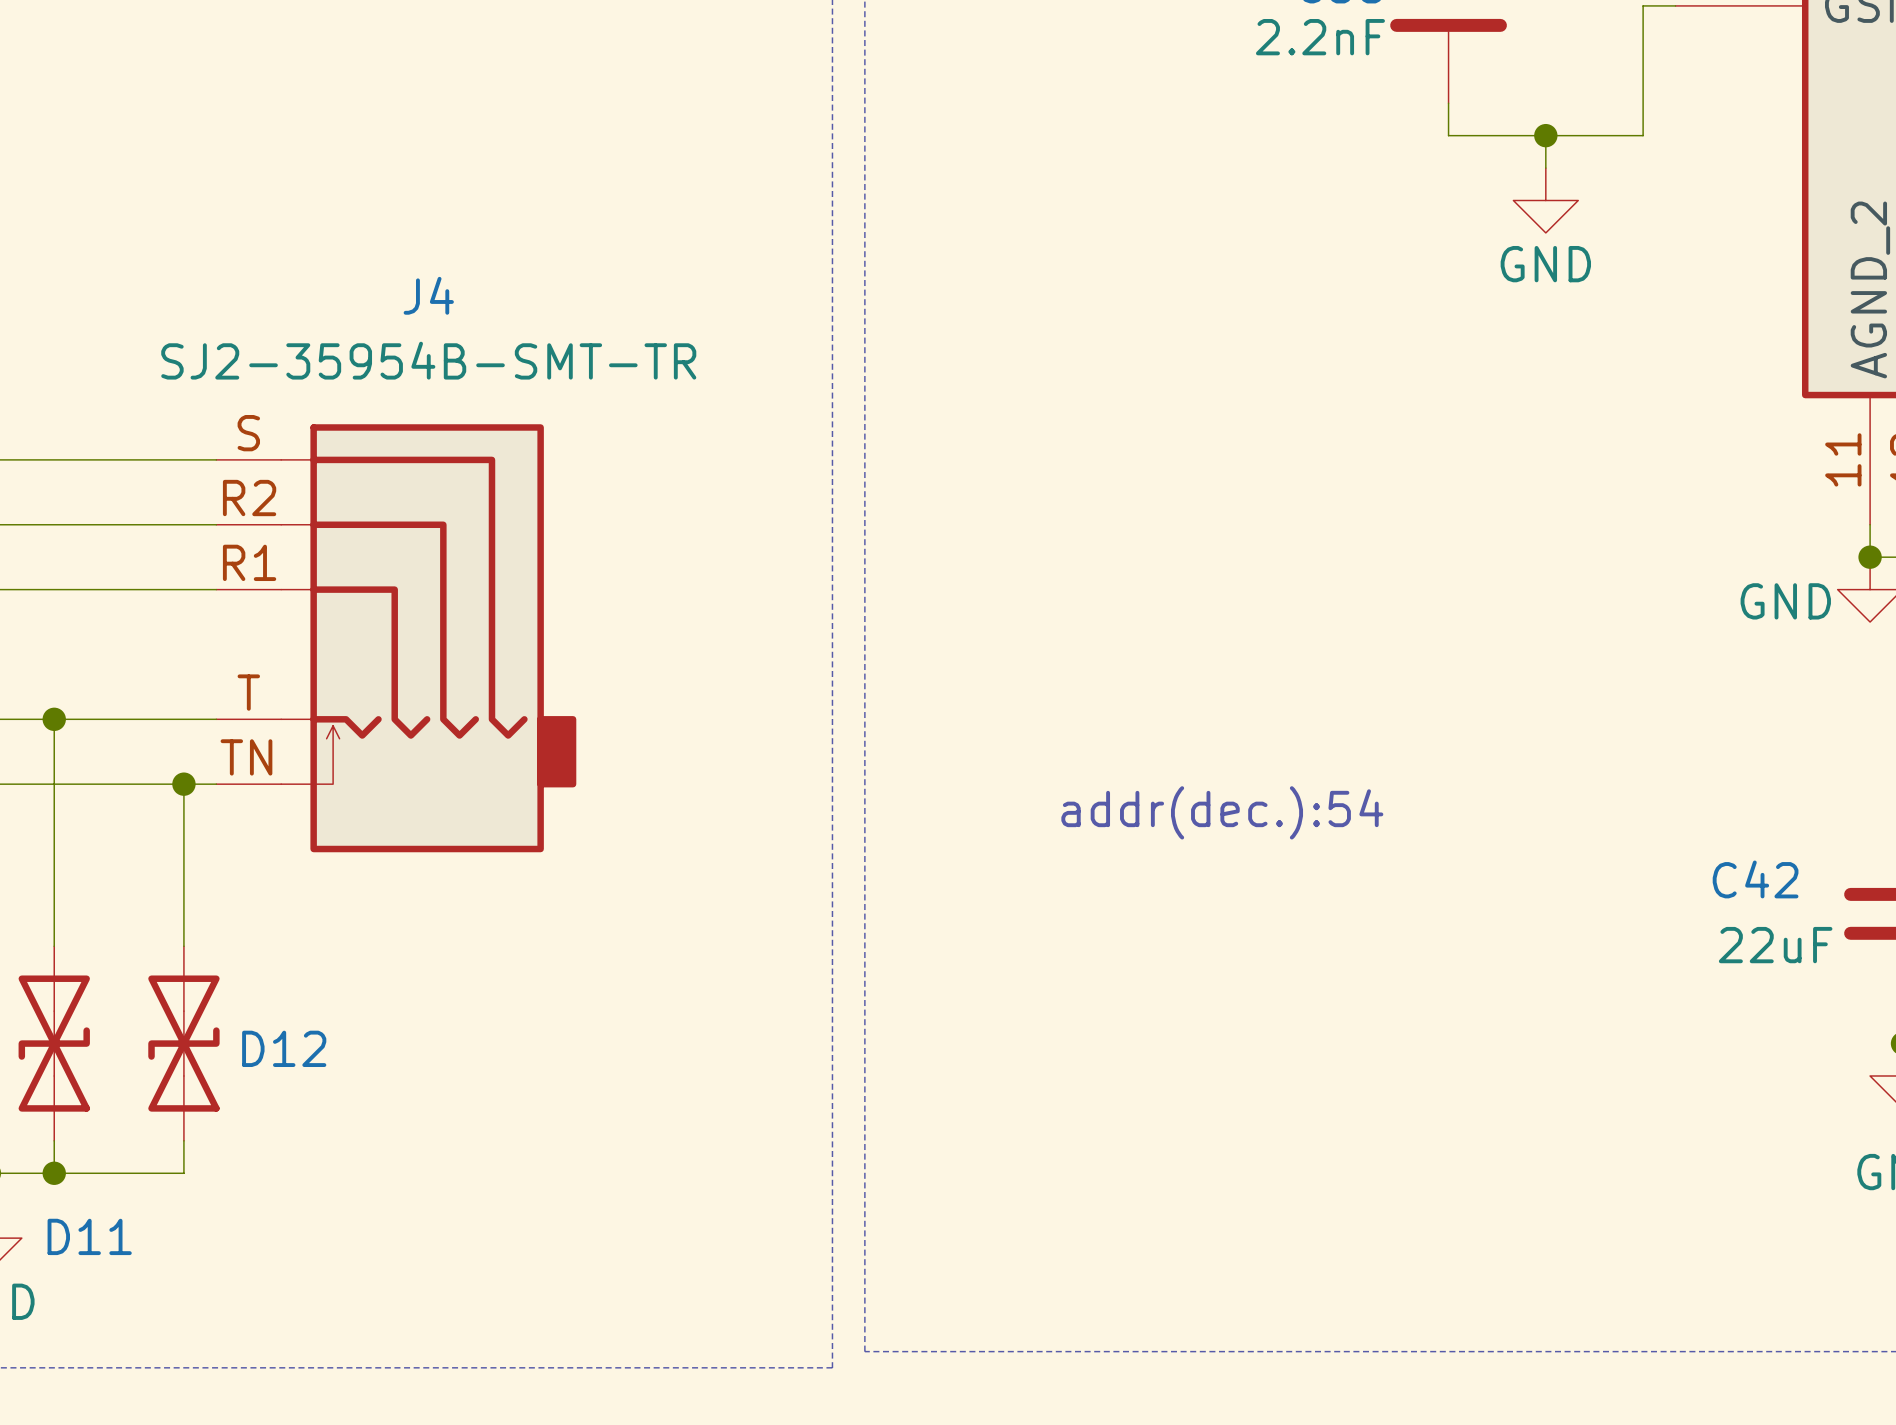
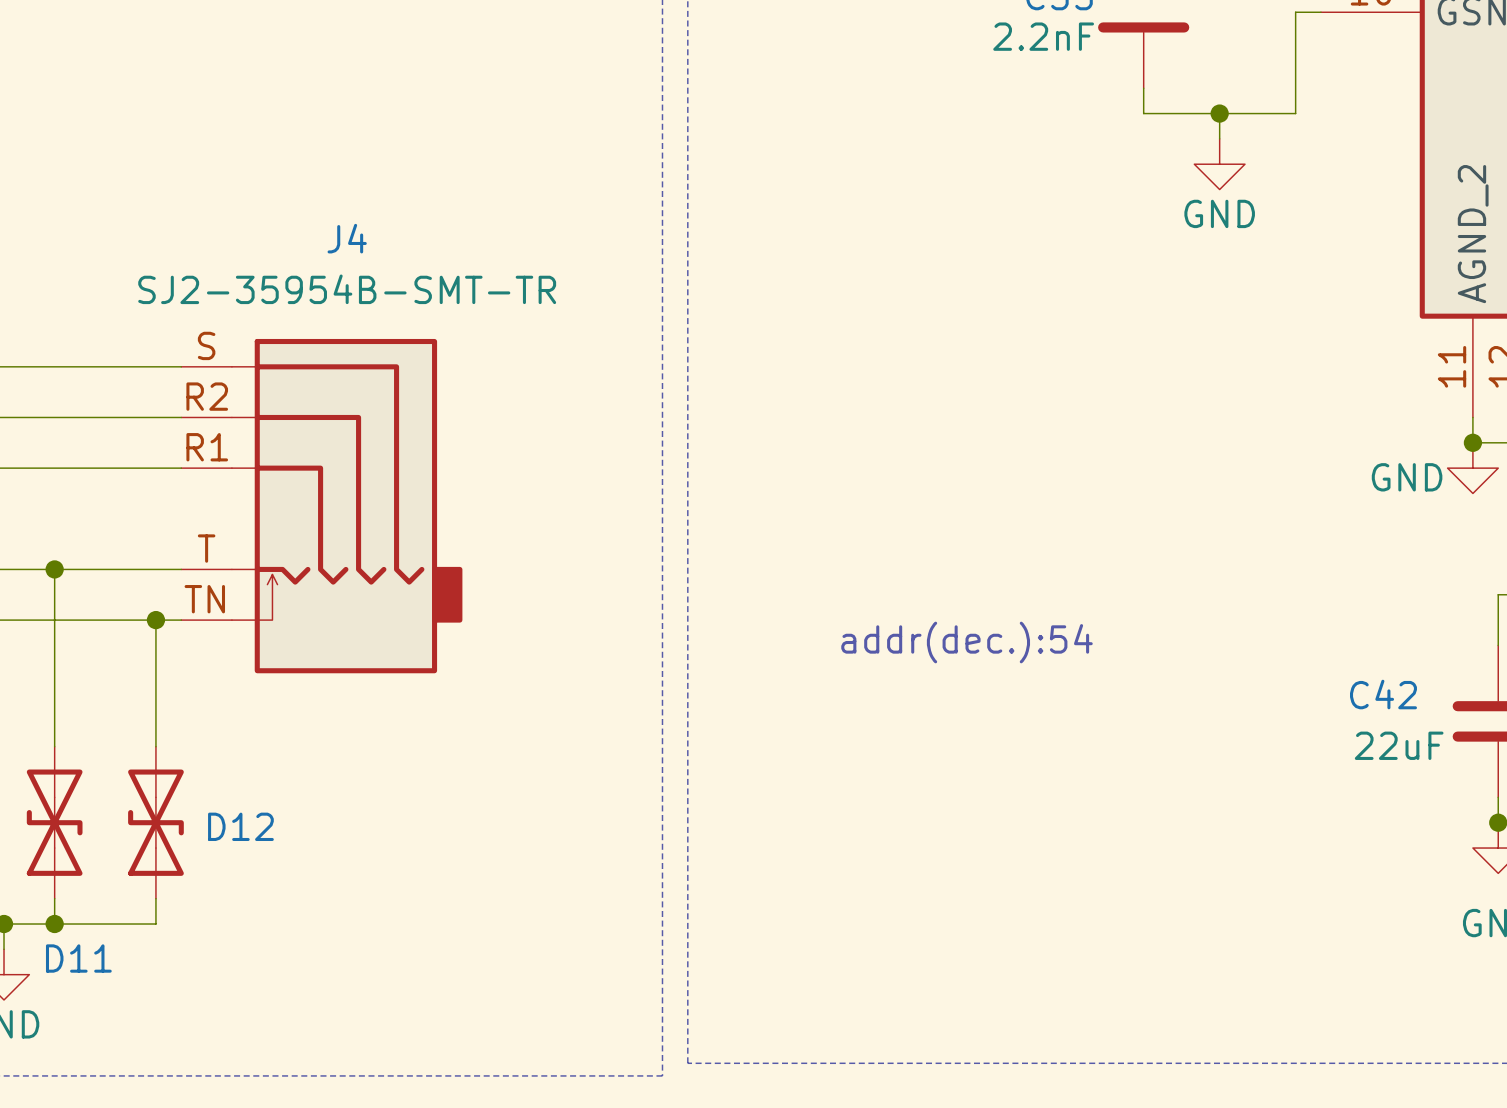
D11 flip: as is (54, 1043) -> left-right (54, 822)
D12 flip: as is (183, 1043) -> left-right (155, 822)

